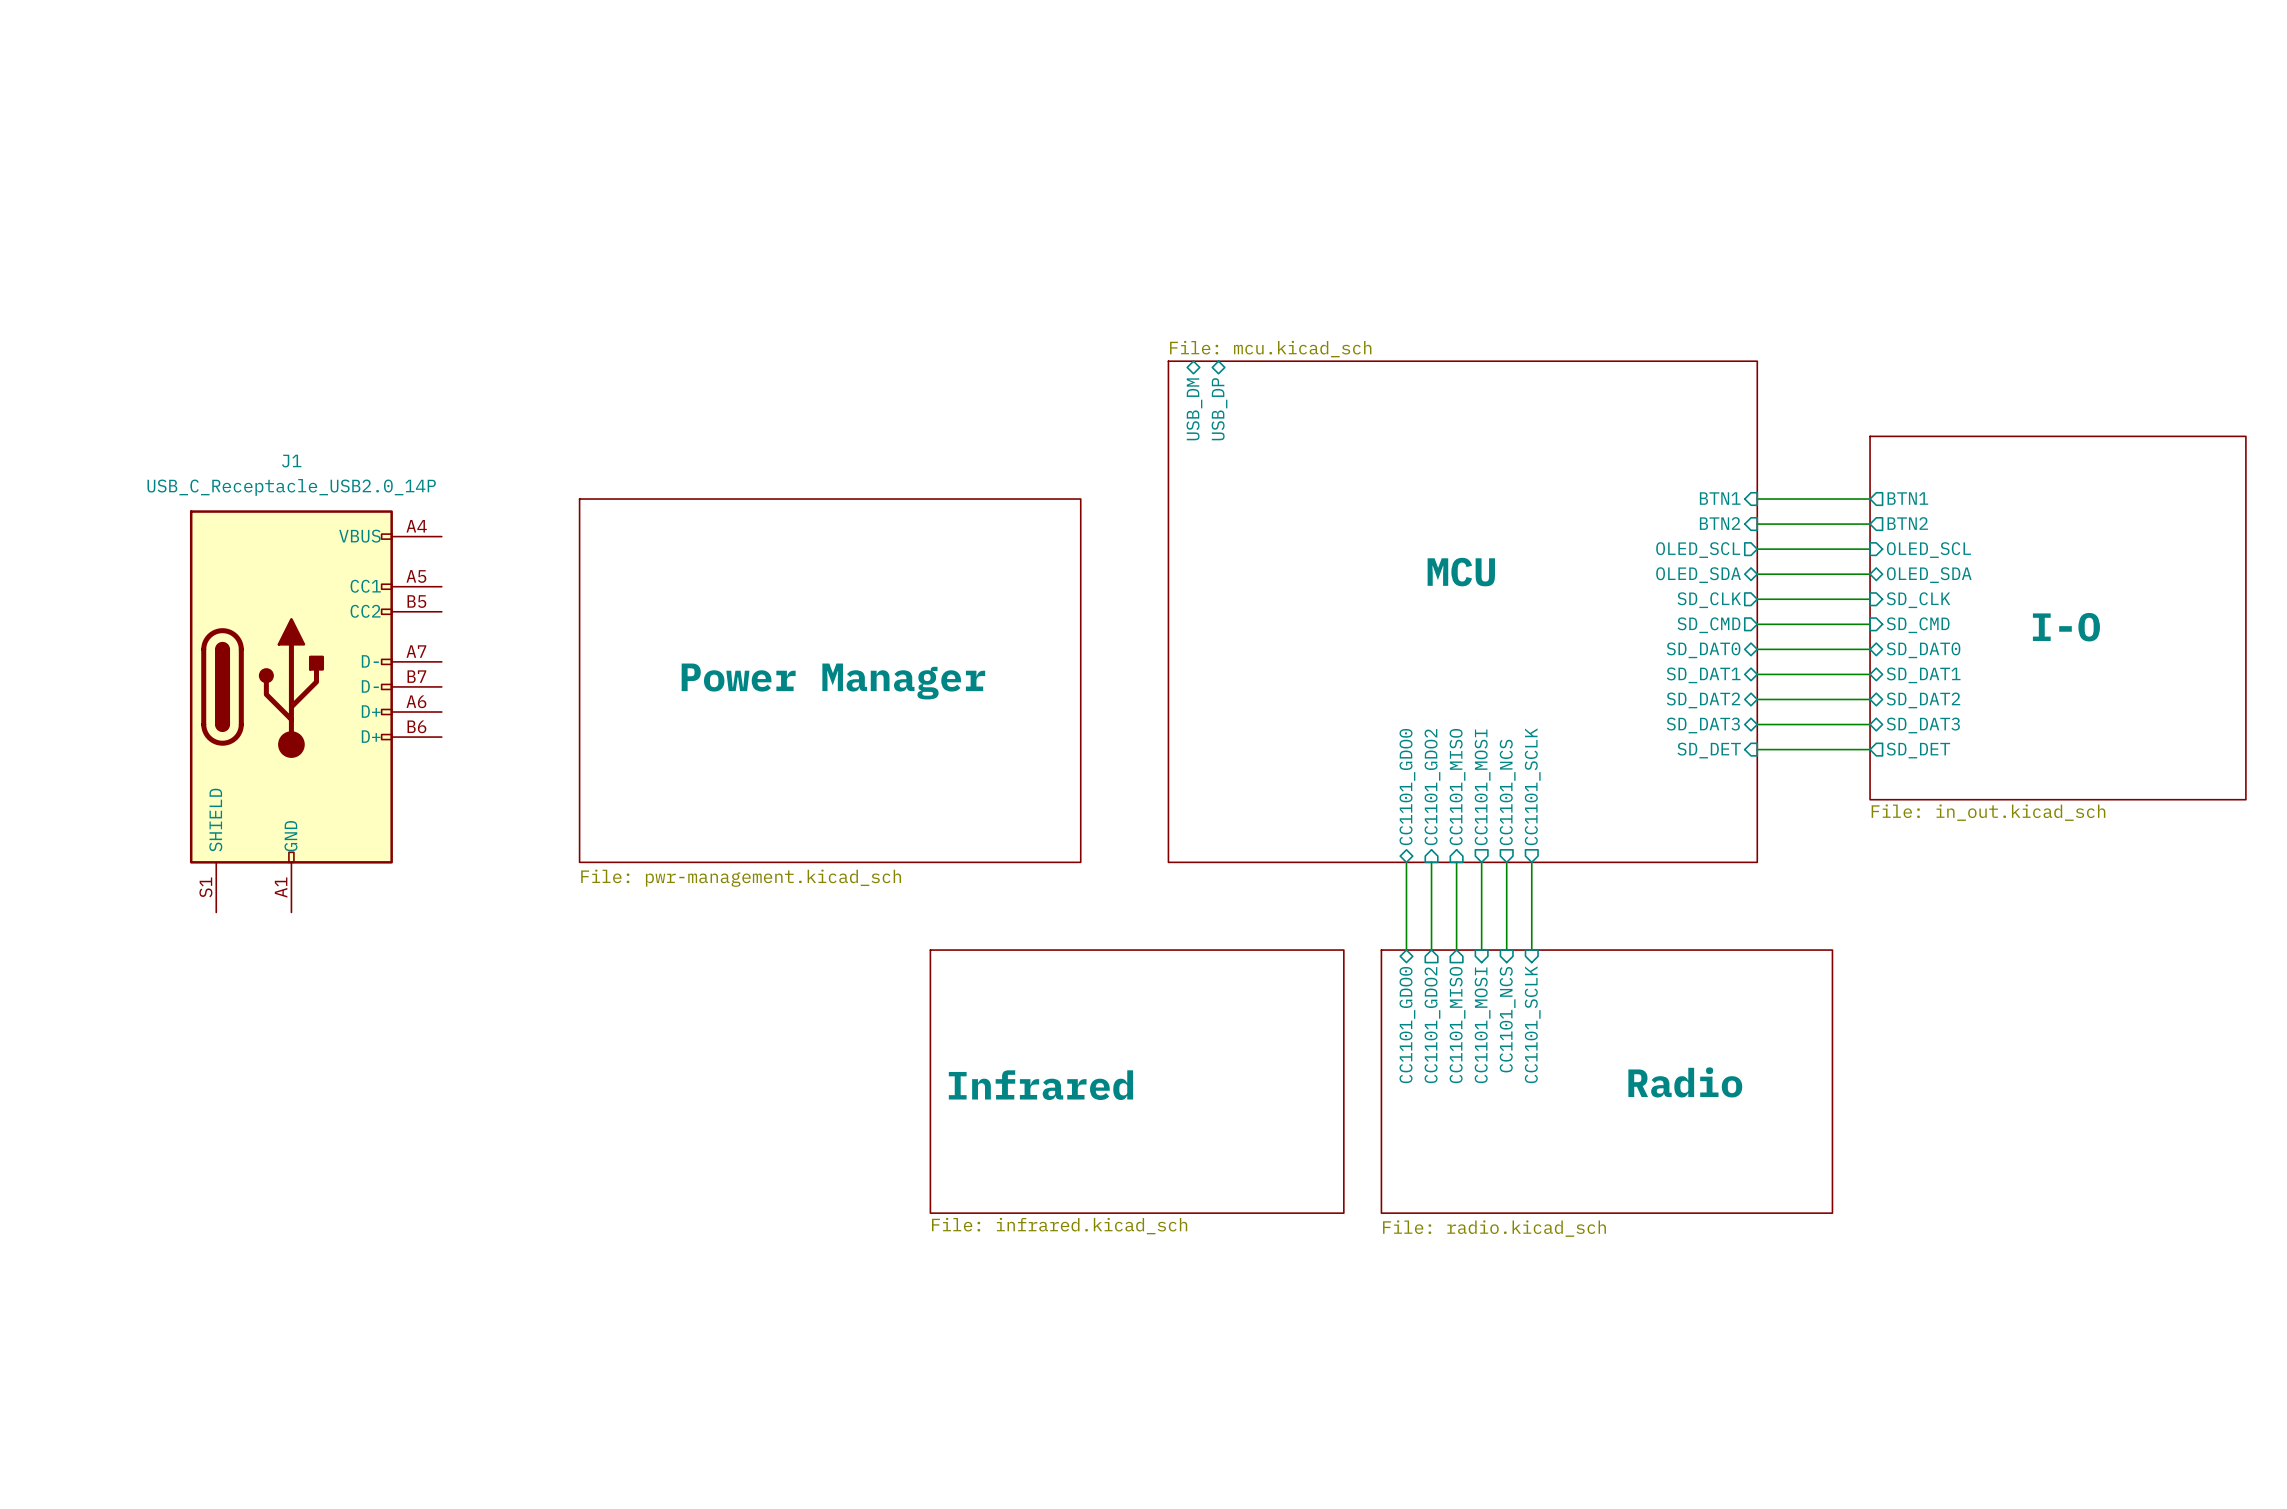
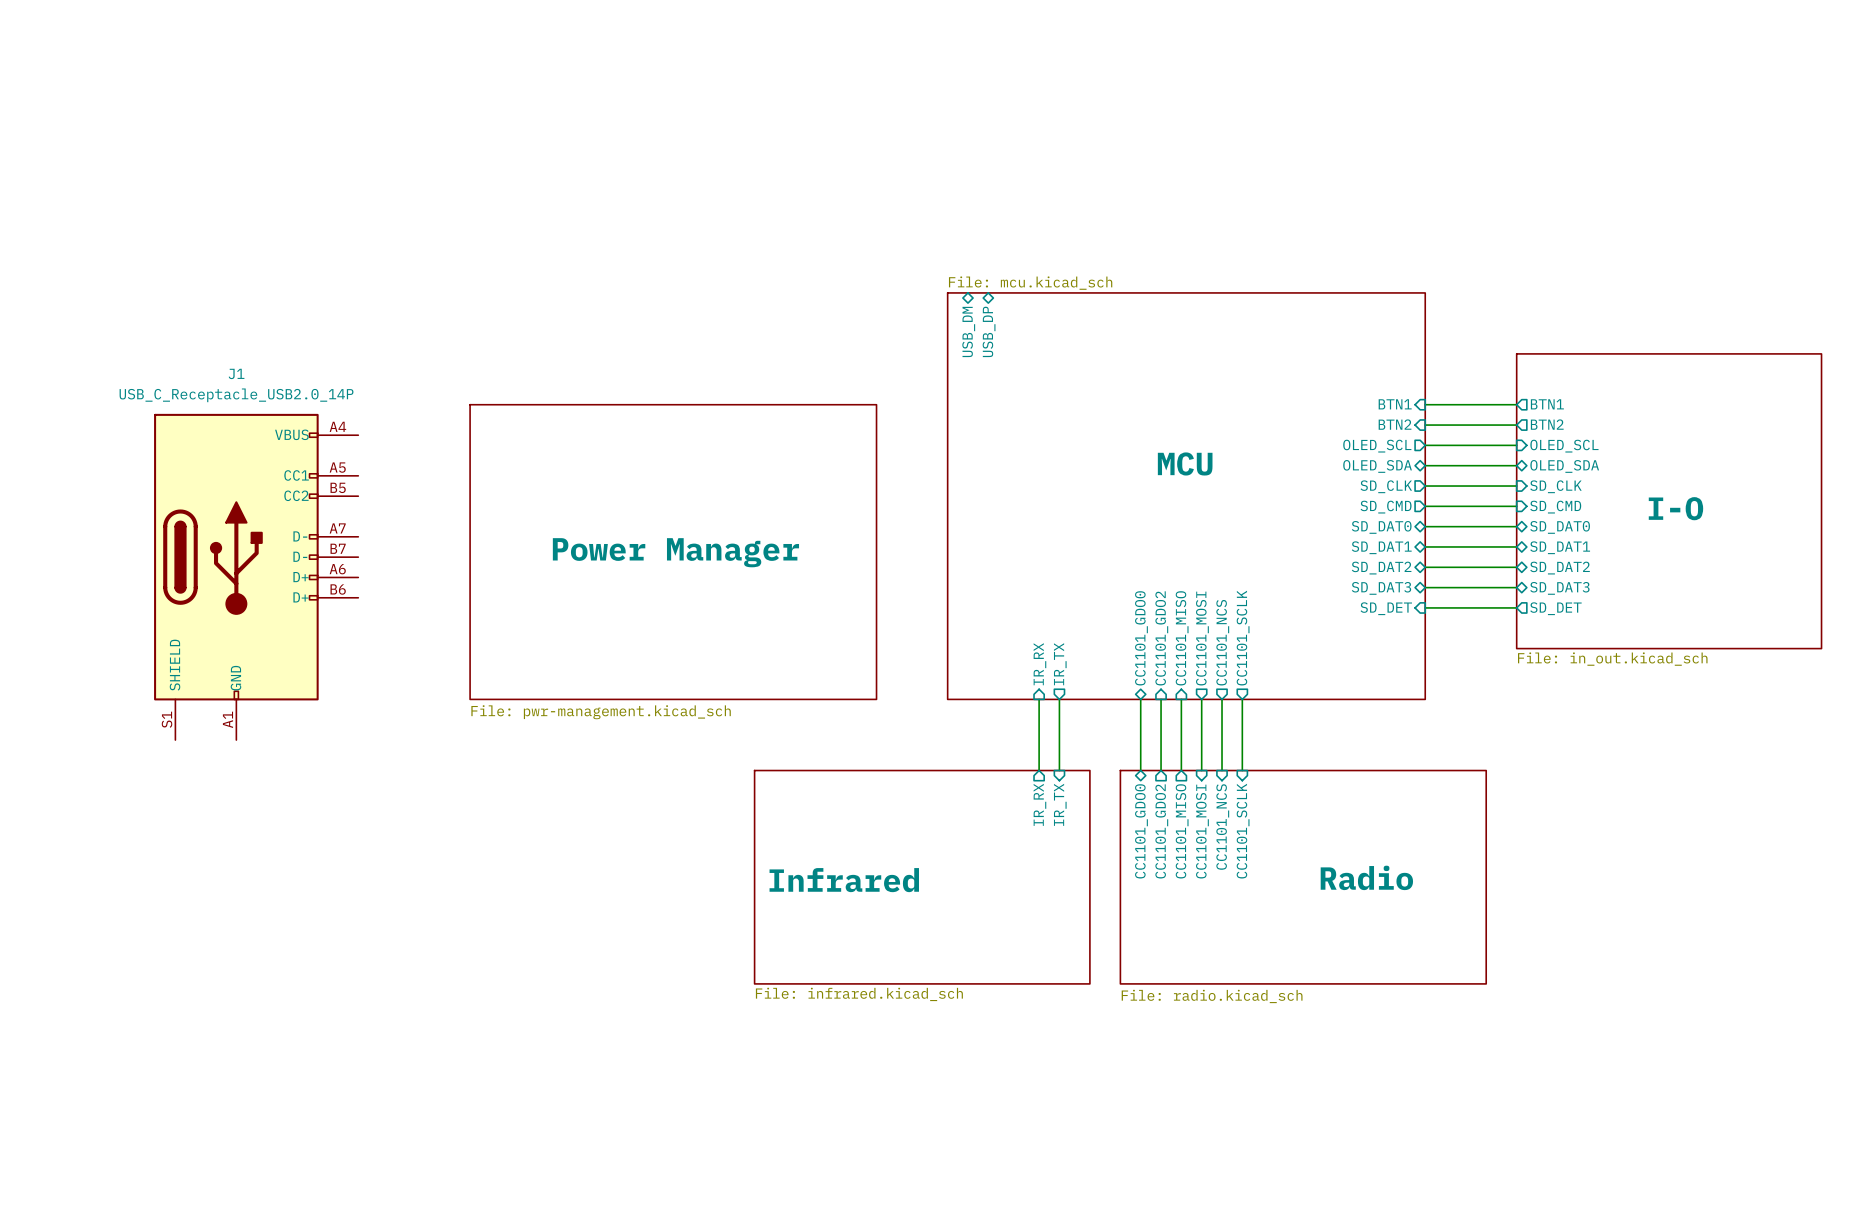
sheet pin: none -> IR_RX (1039, 664)
sheet pin: none -> IR_TX (1060, 664)
wire: none -> (1039, 699) (1039, 770)
wire: none -> (1059, 699) (1059, 770)
sheet pin: none -> IR_RX (1039, 804)
sheet pin: none -> IR_TX (1060, 804)

